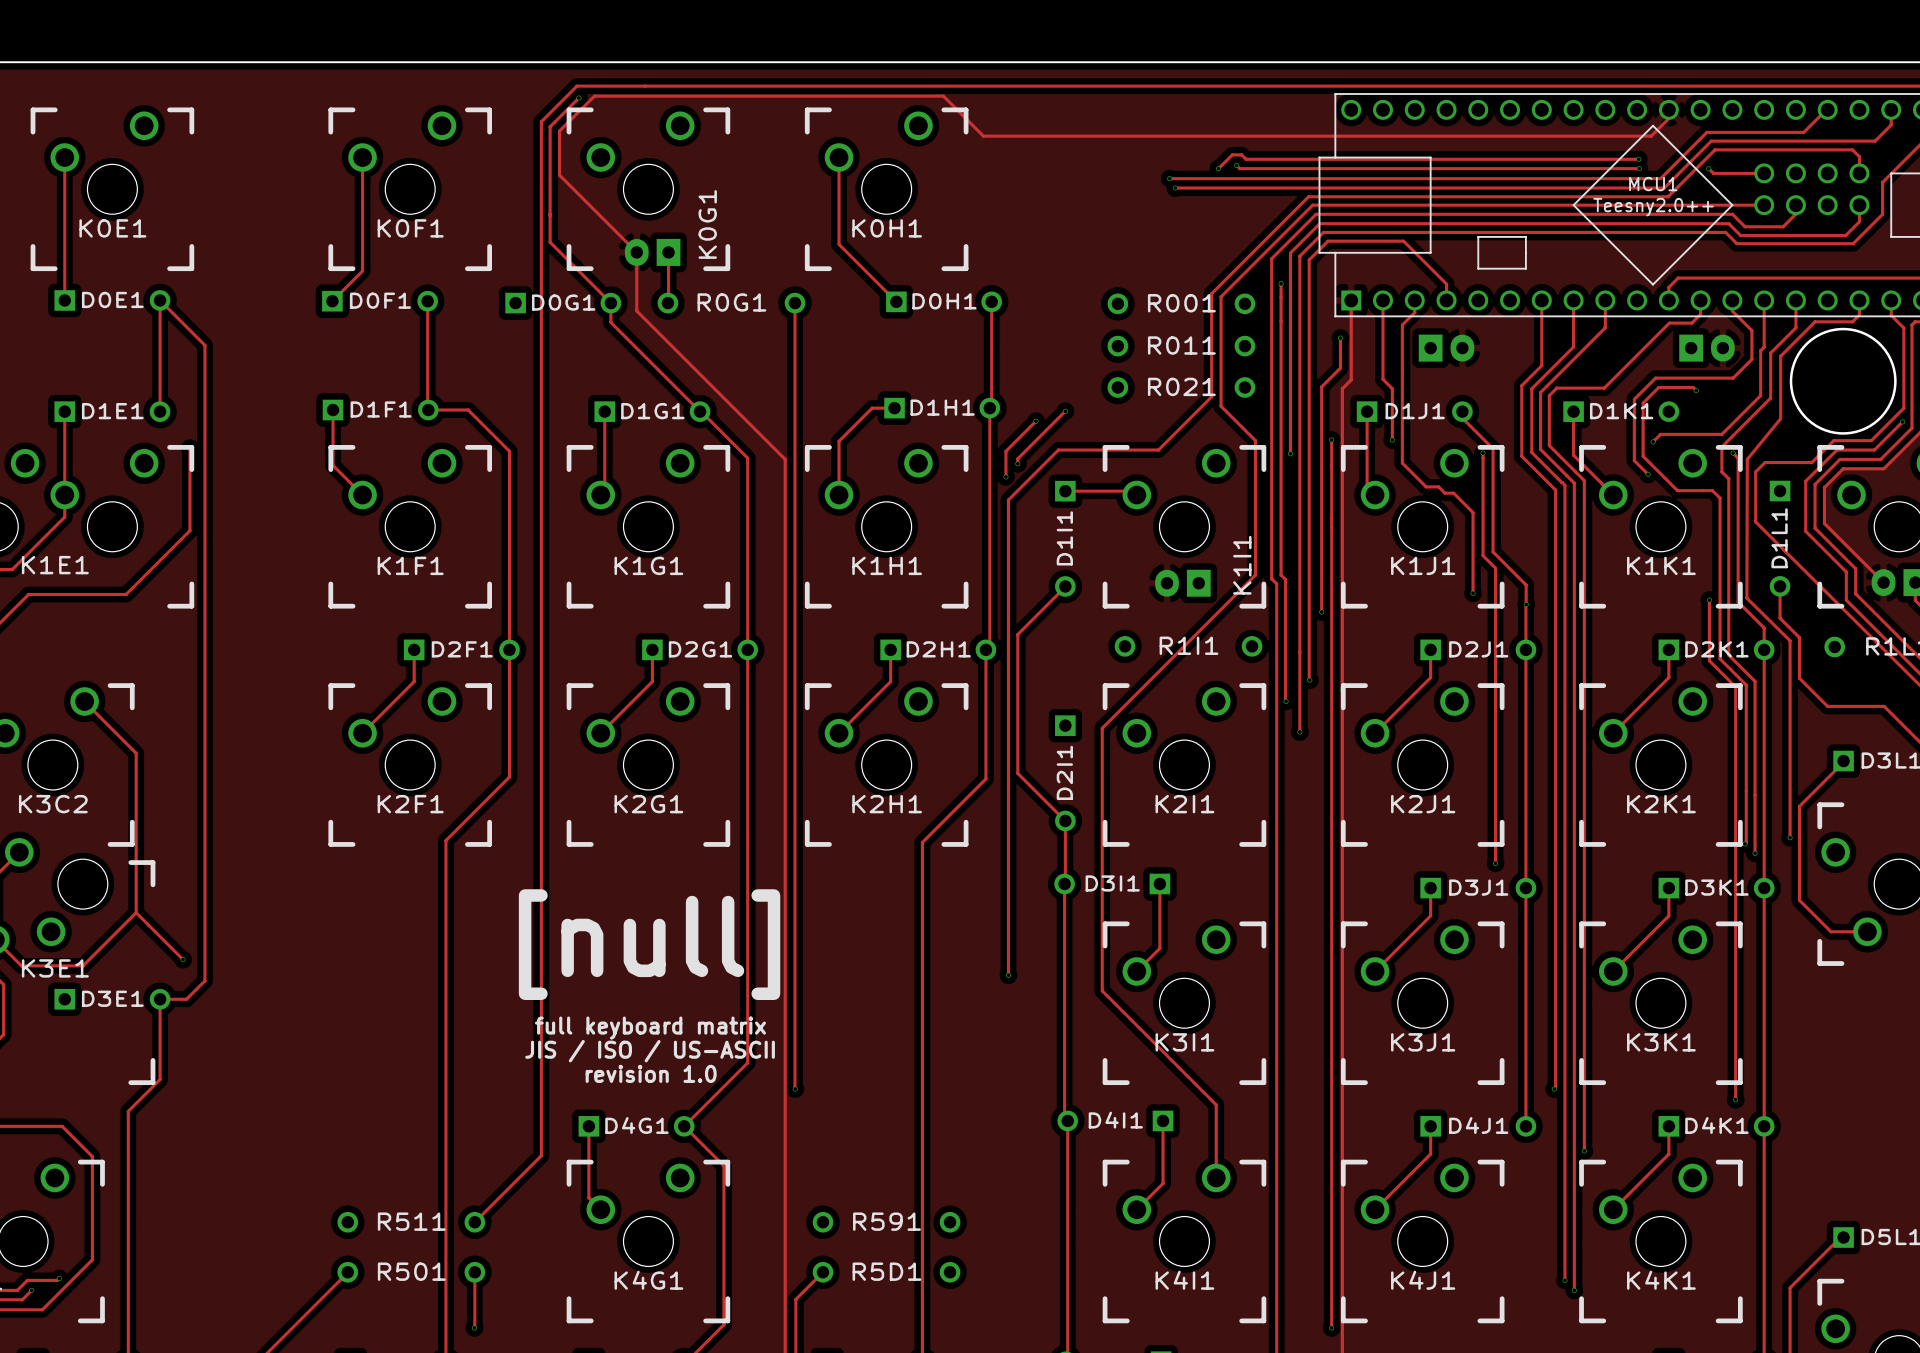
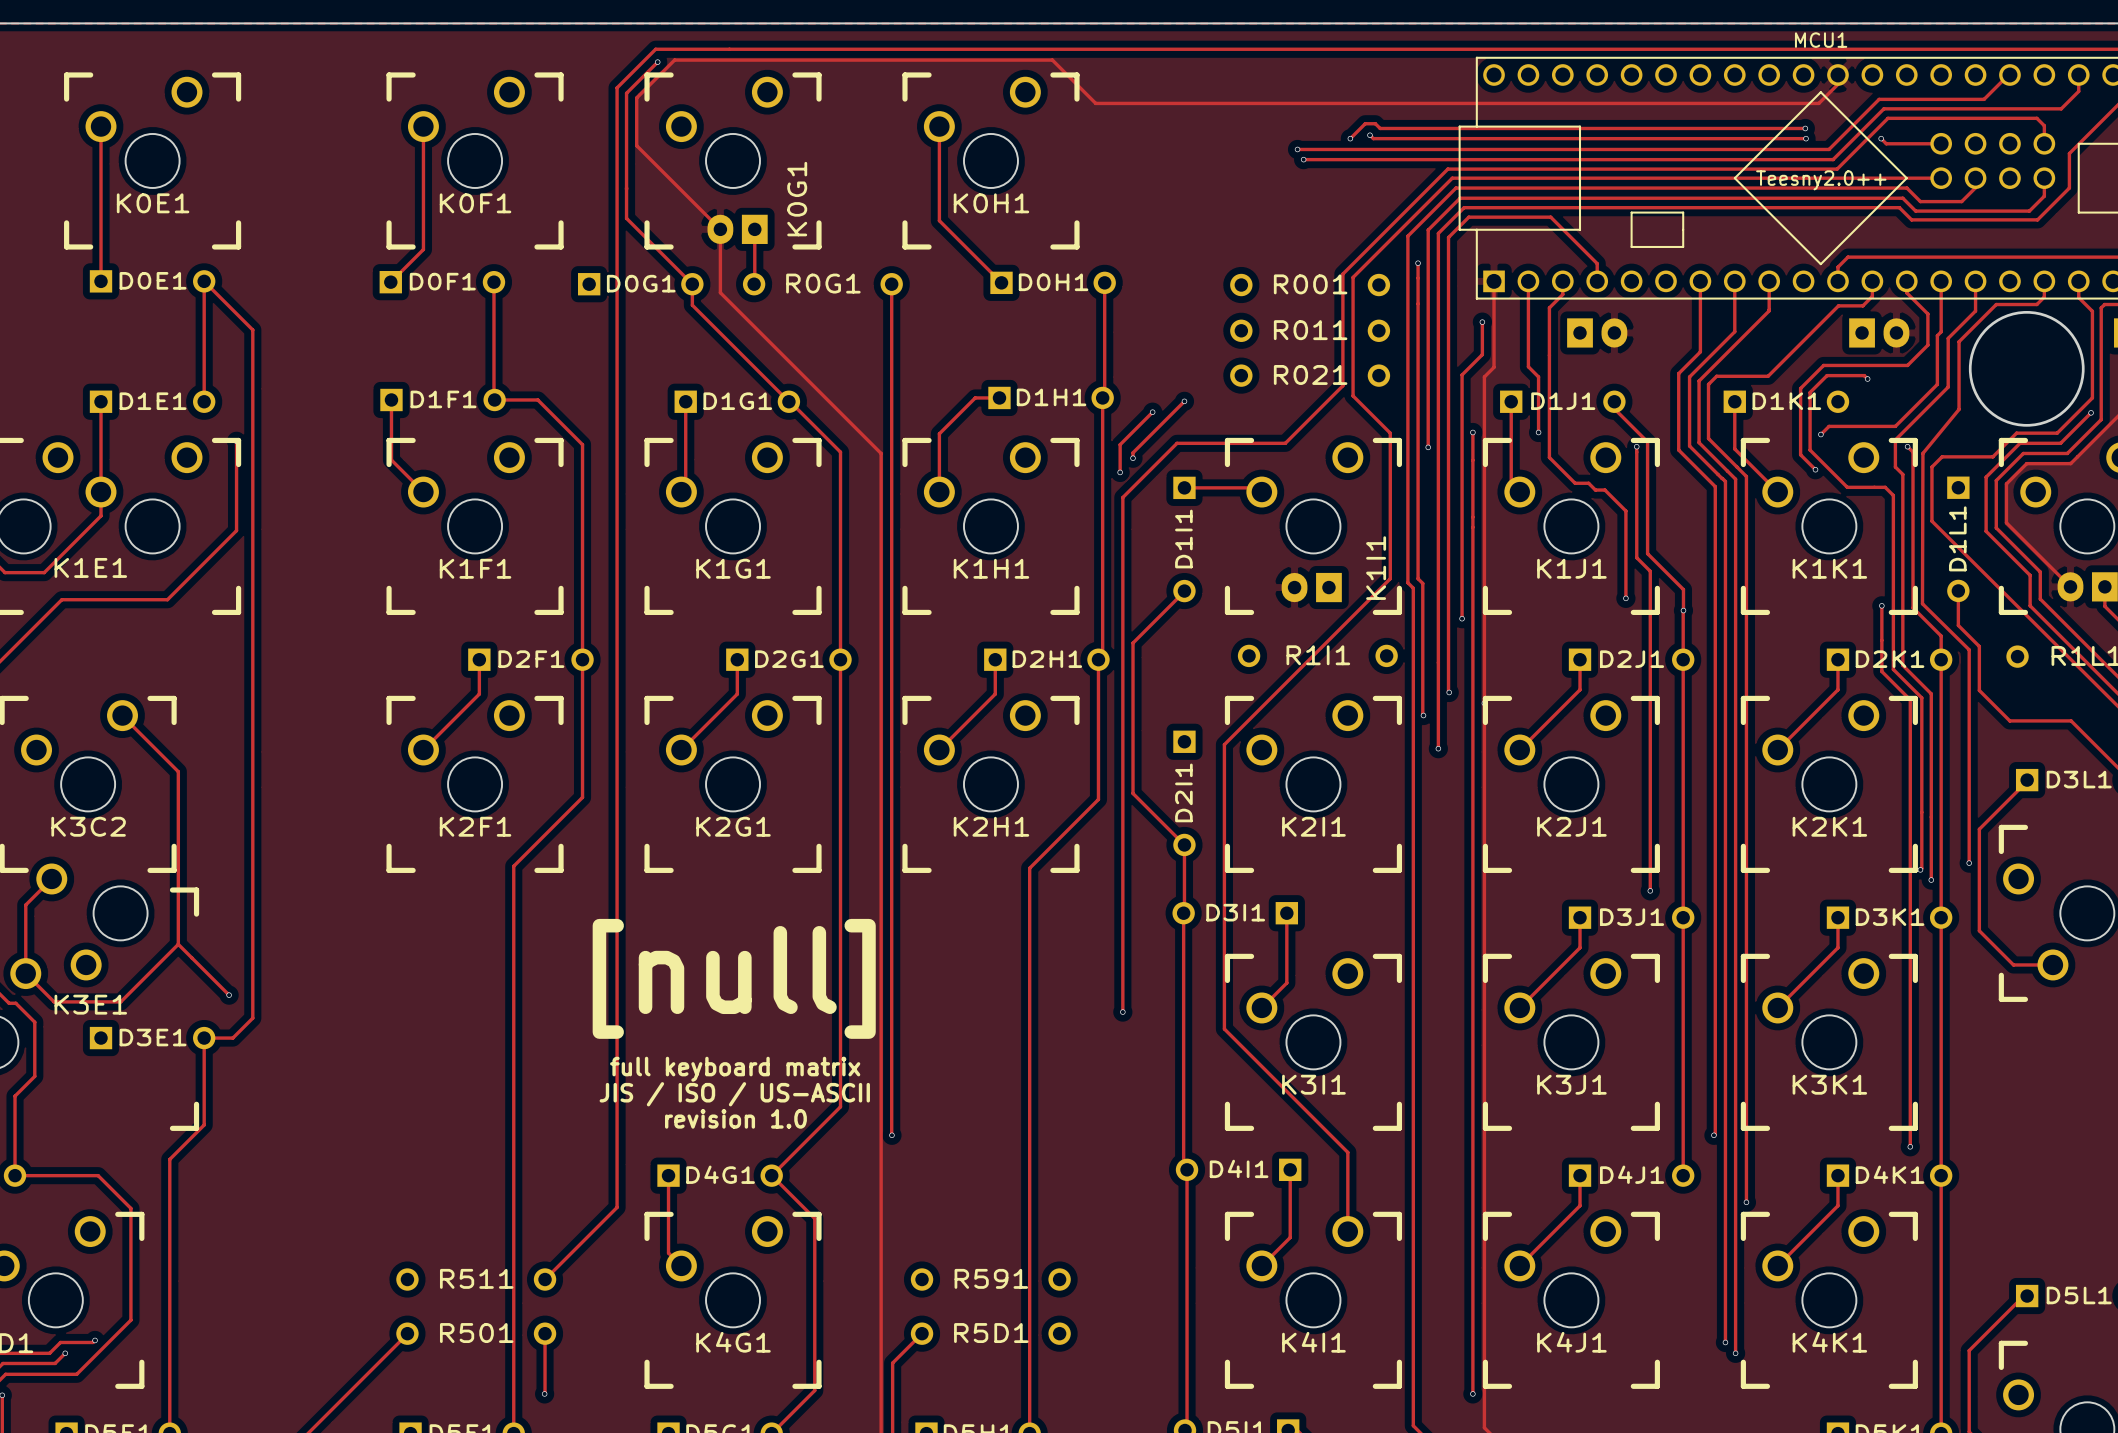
MCU1 name position: MCU1 (1653, 184) -> MCU1 (1821, 40)

